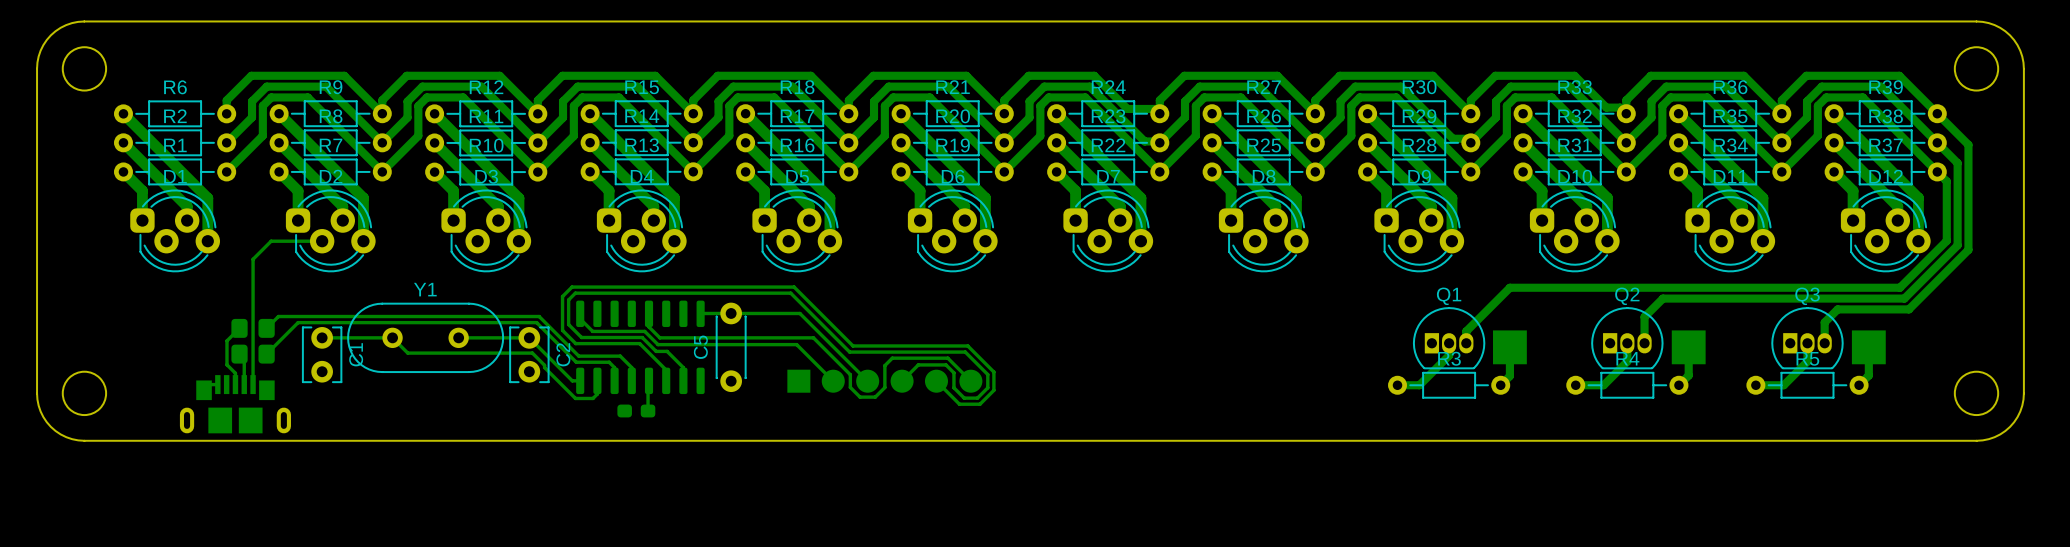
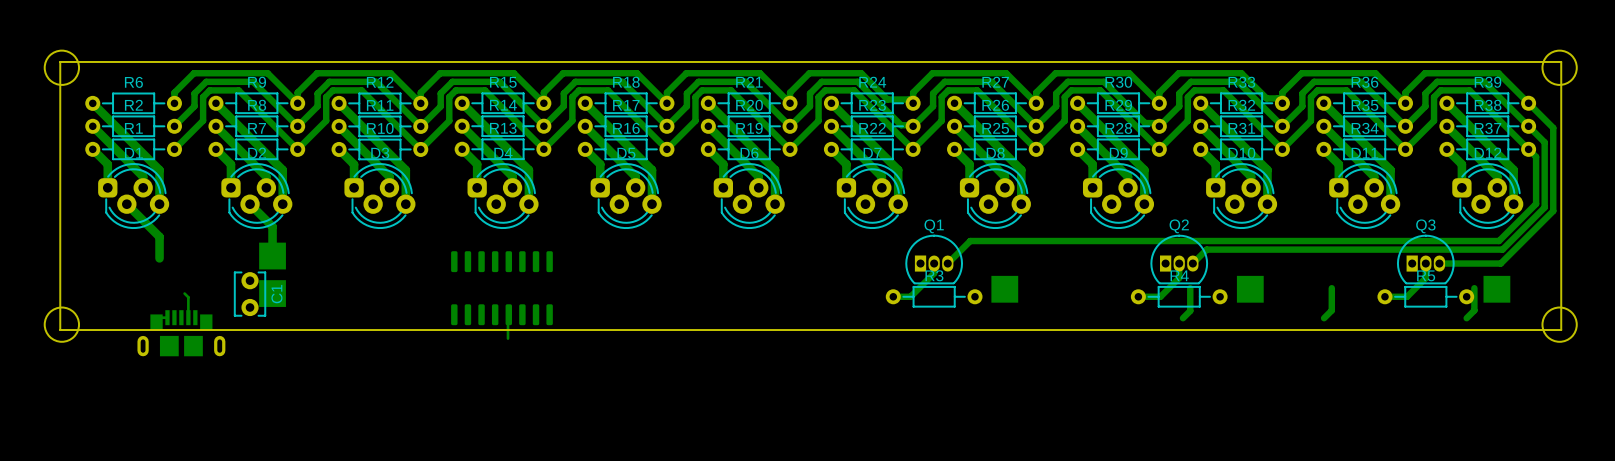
board edge: (84, 21) (1982, 21) (2000, 27) (2010, 35) (2017, 45) (2023, 62) (2023, 399) (2017, 417) (2005, 430) (1988, 439) (1976, 440) (78, 440) (60, 434) (50, 426) (40, 411) (37, 399) (37, 68) (40, 50) (50, 35) (66, 25) (84, 21) -> (60, 61) (60, 330) (1561, 330) (1561, 61) (60, 61)
bottom track: none -> (126, 204) (159, 236) (159, 258)
bottom track: (322, 241) (271, 241) (253, 259) (253, 384) -> (250, 204) (272, 226) (272, 256)
bottom track: (1509, 287) (1466, 331) (1466, 343) -> (1190, 241) (970, 241) (947, 263)
bottom track: (1662, 298) (1644, 317) (1644, 343) -> (1311, 249) (1206, 249) (1192, 263)
part: none -> (272, 256)
bottom track: (1908, 309) (1837, 309) (1824, 322) (1824, 343) -> (1506, 258) (1500, 263) (1439, 263)
bottom track: (580, 313) (580, 318) (592, 331) (644, 331) (658, 344) (796, 344) (833, 381) -> none
bottom track: (649, 313) (649, 327) (659, 337) (813, 337) (850, 374) (850, 387) (860, 397) (875, 397) (884, 387) (884, 365) (892, 358) (947, 358) (970, 381) -> none
bottom track: (700, 313) (799, 313) (867, 381) -> none
bottom track: (239, 328) (226, 340) (226, 364) (235, 373) (235, 384) -> none
part: (253, 328) -> none
bottom track: (266, 328) (278, 316) (539, 316) (578, 356) (620, 356) (631, 367) (631, 380) -> none
bottom track: (322, 337) (392, 337) (407, 353) (532, 353) (575, 398) (593, 398) (597, 394) (597, 380) -> none
Y1: (425, 337) -> none
bottom track: (458, 337) (529, 337) (572, 380) (580, 380) -> none
Q1 position: (1449, 338) -> (934, 259)
Q2 position: (1627, 338) -> (1179, 259)
Q3 position: (1807, 338) -> (1425, 259)
bottom track: (1449, 343) (1449, 355) (1419, 385) (1397, 385) -> (934, 263) (934, 273) (910, 296) (893, 296)
bottom track: (1627, 343) (1627, 361) (1603, 385) (1575, 385) -> (1179, 263) (1179, 278) (1160, 296) (1138, 296)
bottom track: (1807, 343) (1807, 361) (1783, 385) (1755, 385) -> (1425, 263) (1425, 278) (1407, 296) (1384, 296)
C5: (731, 347) -> none
part: (1509, 347) -> none
part: (1688, 347) -> none
part position: (1868, 347) -> (1496, 289)
part: none -> (1004, 289)
part: none -> (1250, 289)
part: (253, 354) -> none
bottom track: (266, 354) (298, 322) (536, 322) (576, 362) (609, 362) (614, 367) (614, 380) -> none
part: none -> (272, 293)
C2: (529, 354) -> none
bottom track: (666, 380) (666, 370) (639, 343) (575, 343) (562, 330) (562, 296) (572, 287) (794, 287) (853, 345) (967, 345) (993, 372) (993, 390) (980, 404) (959, 404) (936, 381) -> none
bottom track: (683, 380) (683, 367) (667, 351) (656, 351) (642, 337) (581, 337) (568, 324) (568, 299) (575, 293) (790, 293) (849, 352) (965, 352) (987, 374) (987, 387) (977, 398) (964, 398) (953, 387) (953, 372) (946, 364) (918, 364) (902, 381) -> none
part: (884, 381) -> none
R3 position: (1449, 385) -> (934, 296)
R4 position: (1627, 385) -> (1179, 296)
R5 position: (1807, 385) -> (1425, 296)
part: (636, 410) -> none

